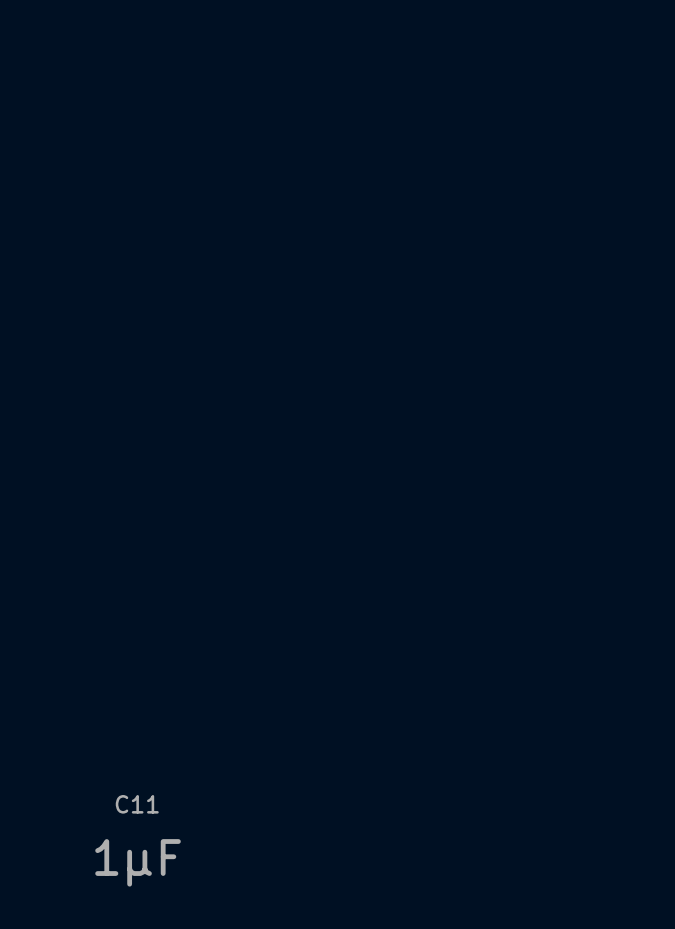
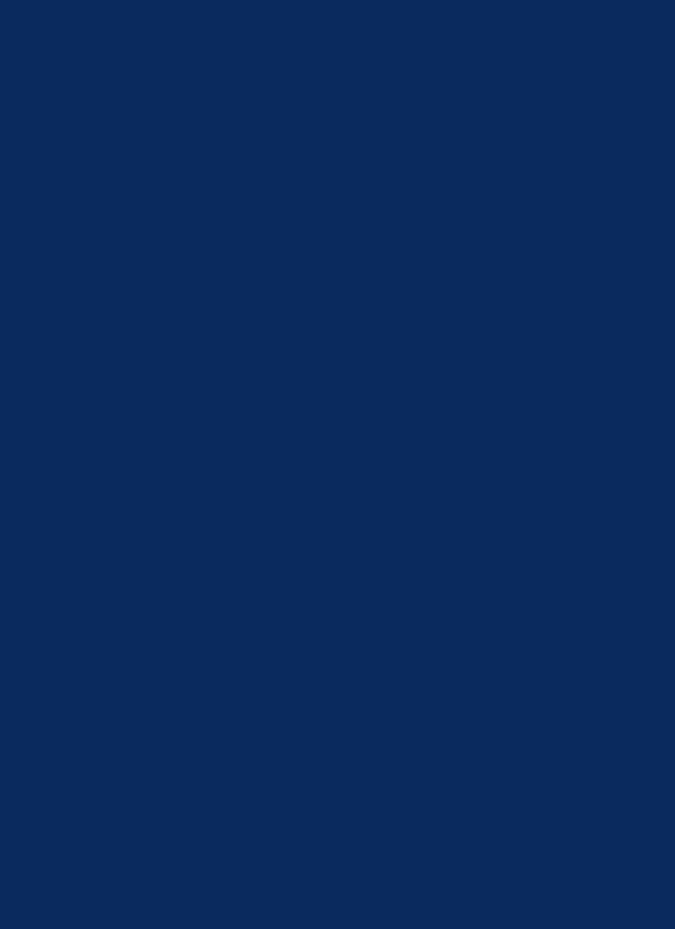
C11: 1µF (138, 840) -> none

